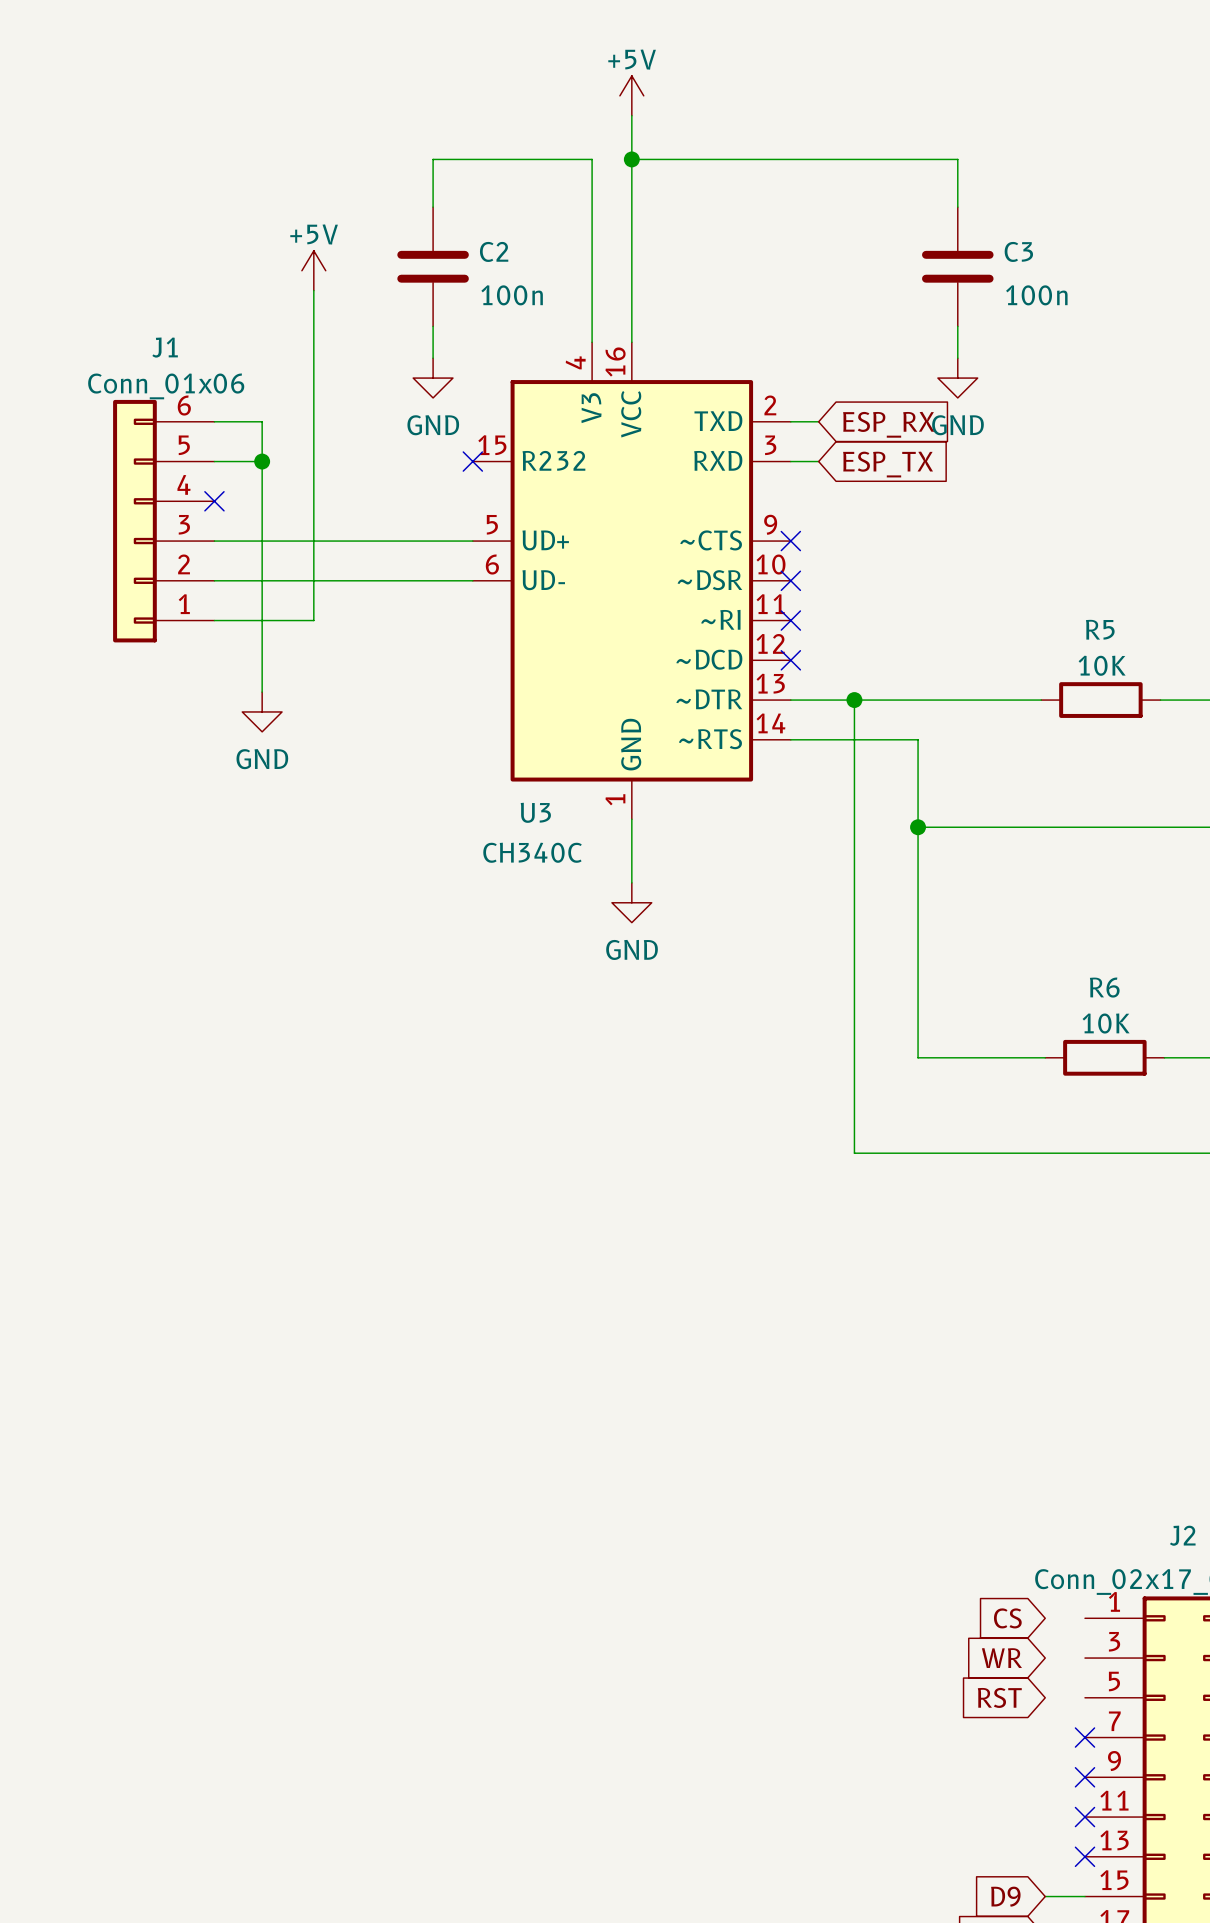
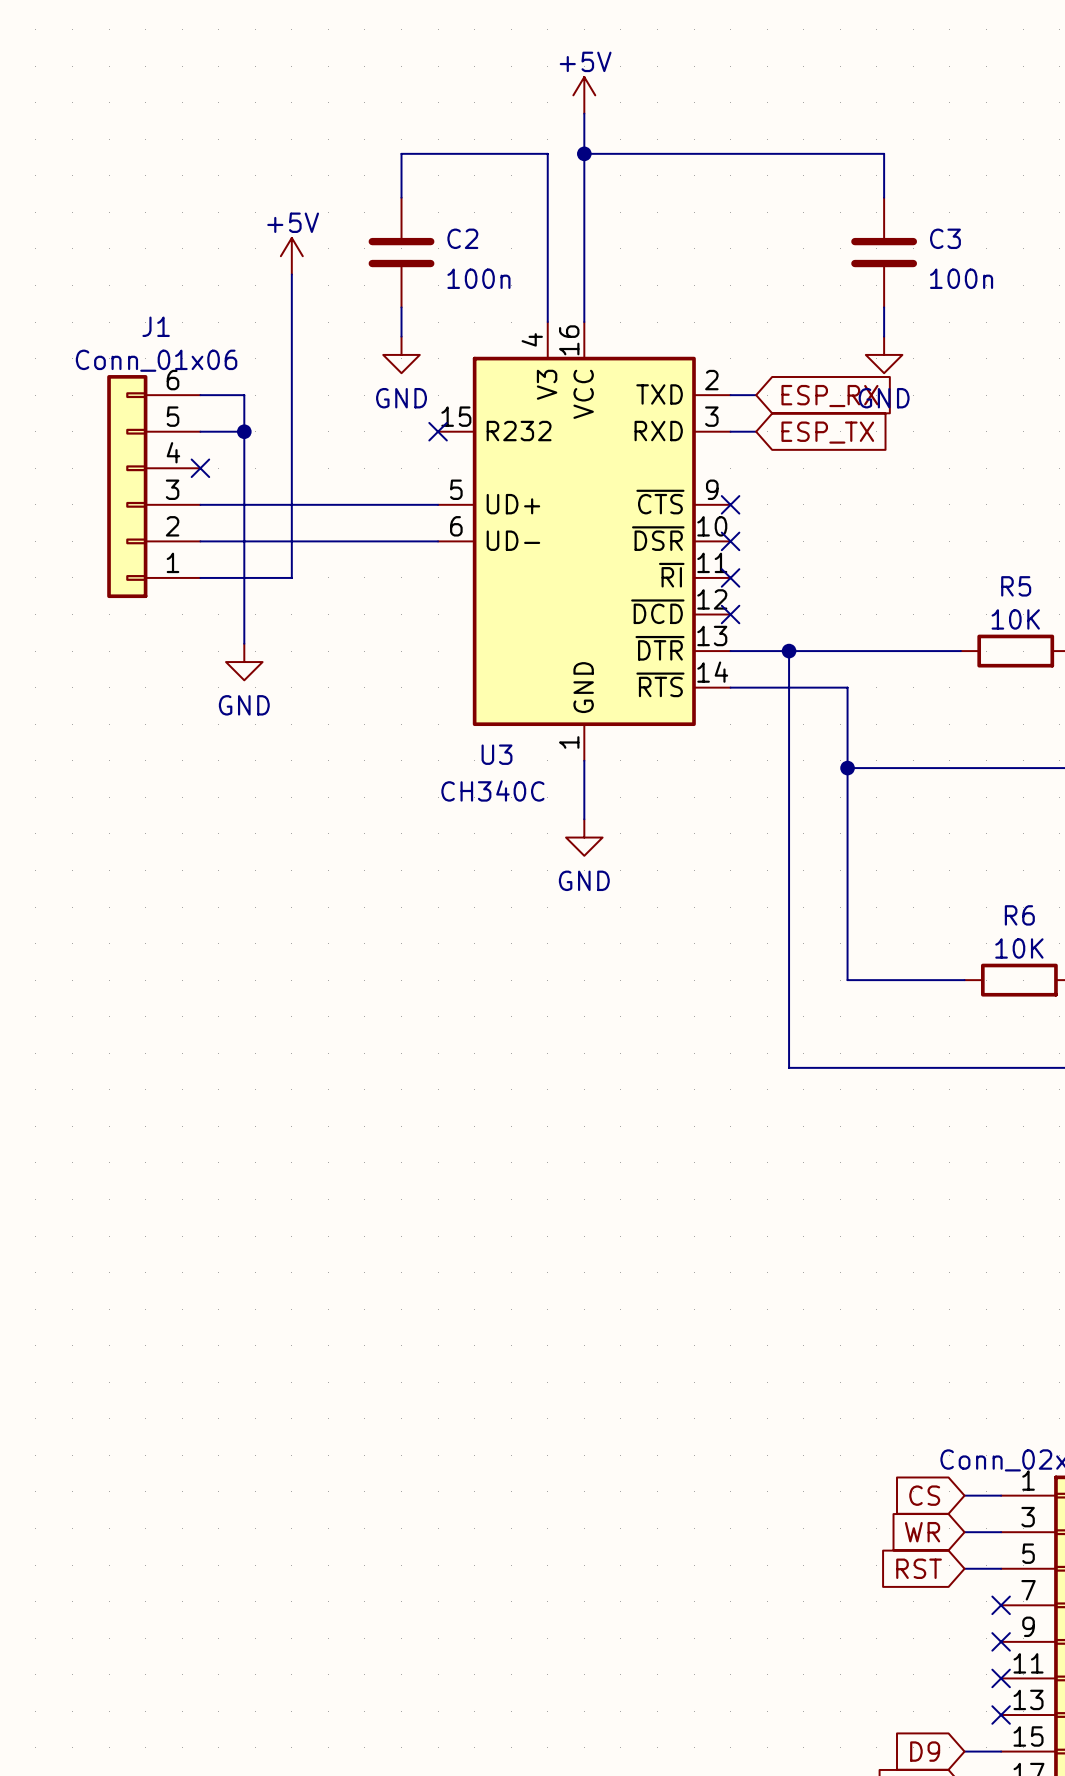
U3 pin name: ~CTS (711, 540) -> ~{CTS} (660, 502)
U3 pin name: ~DSR (709, 580) -> ~{DSR} (658, 538)
U3 pin name: ~RI (720, 619) -> ~{RI} (671, 575)
U3 pin name: ~DCD (709, 659) -> ~{DCD} (657, 611)
U3 pin name: ~DTR (709, 699) -> ~{DTR} (660, 648)
U3 pin name: ~RTS (710, 739) -> ~{RTS} (660, 684)
wire: none -> (964, 1495) (1001, 1495)
wire: none -> (964, 1532) (1001, 1532)
wire: none -> (964, 1568) (1001, 1568)

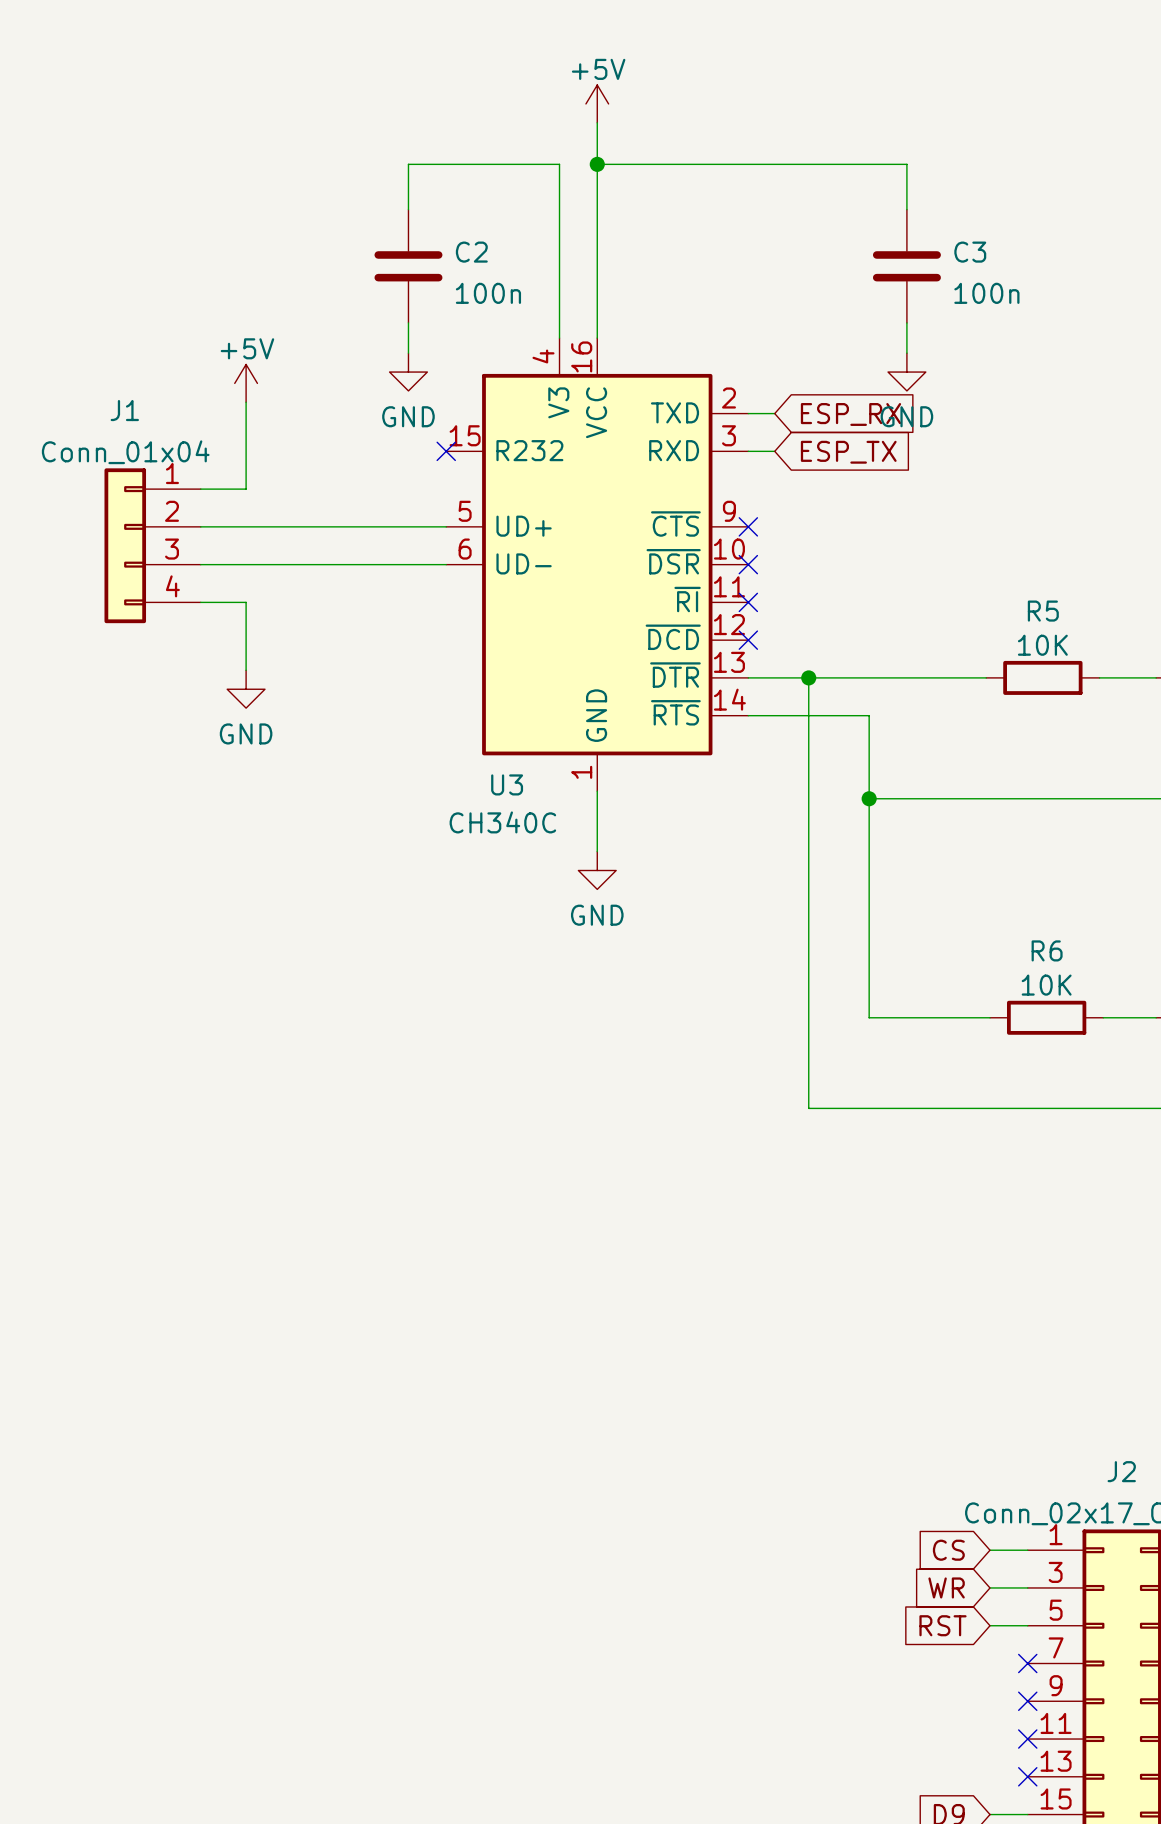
power symbol position: +5V (291, 256) -> +5V (246, 383)
wire: (291, 274) (291, 577) (244, 577) (244, 468) -> (200, 489) (246, 489)
J1 name position: J1 (156, 326) -> J1 (124, 410)
J1 value: Conn_01x06 (156, 360) -> Conn_01x04 (125, 452)
J1 symbol: [107, 375, 201, 599] -> [104, 468, 201, 624]
wire: (200, 395) (244, 395) -> (246, 402) (246, 413)
wire: (200, 431) (244, 431) -> none
junction: (244, 431) -> none
no-connect mark: (200, 468) -> none

